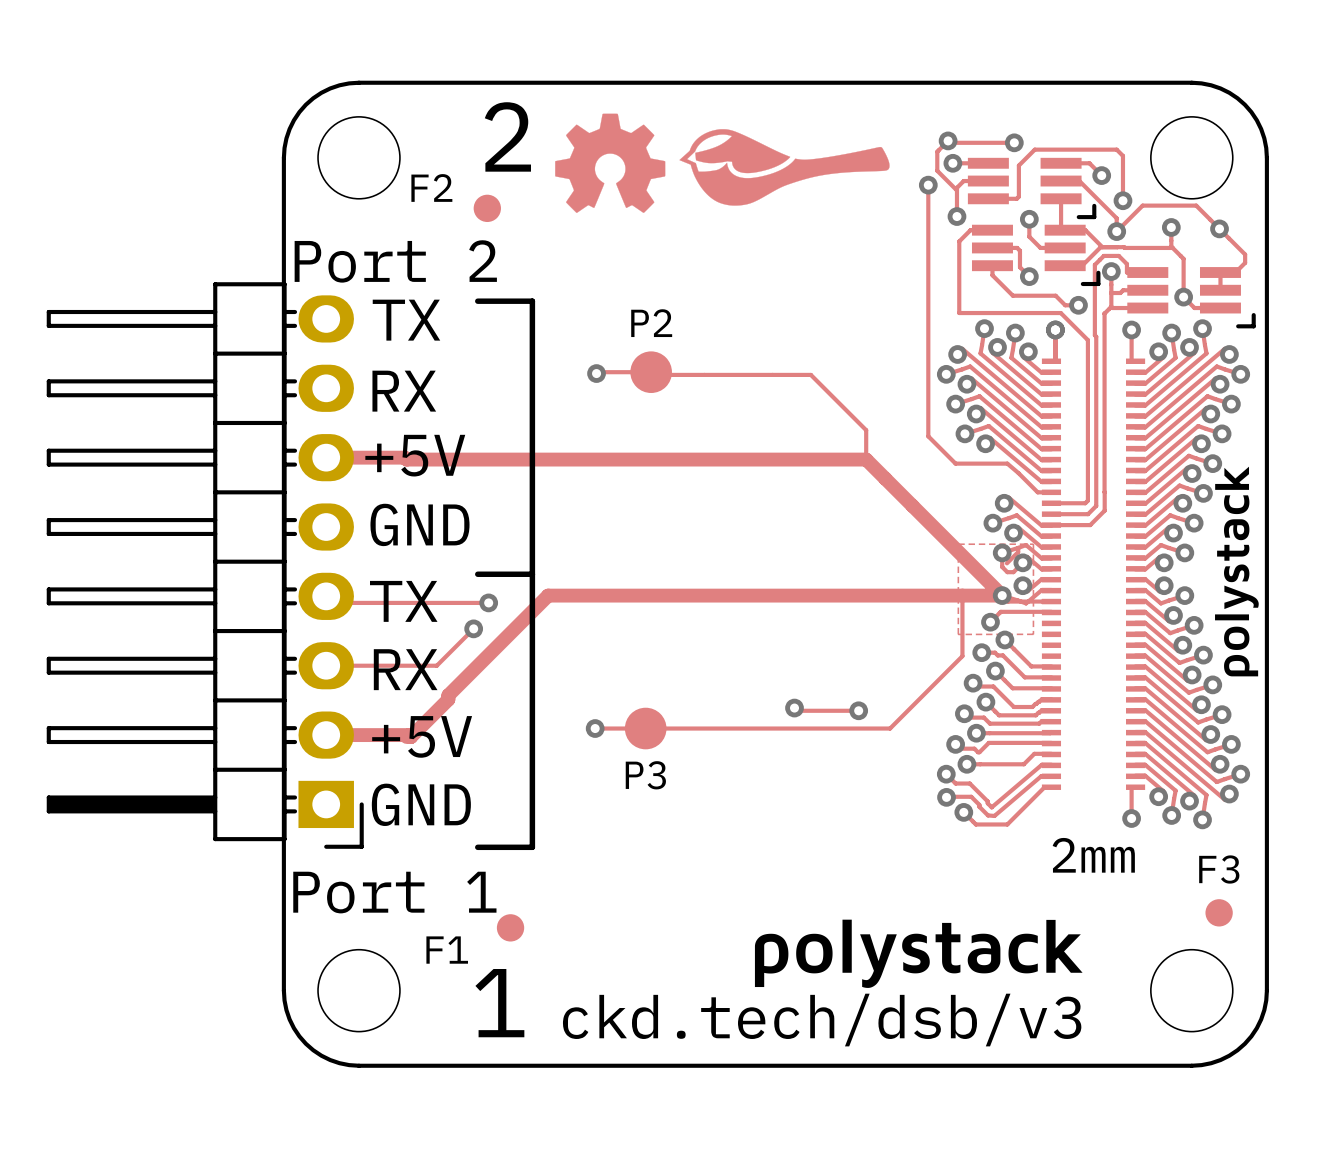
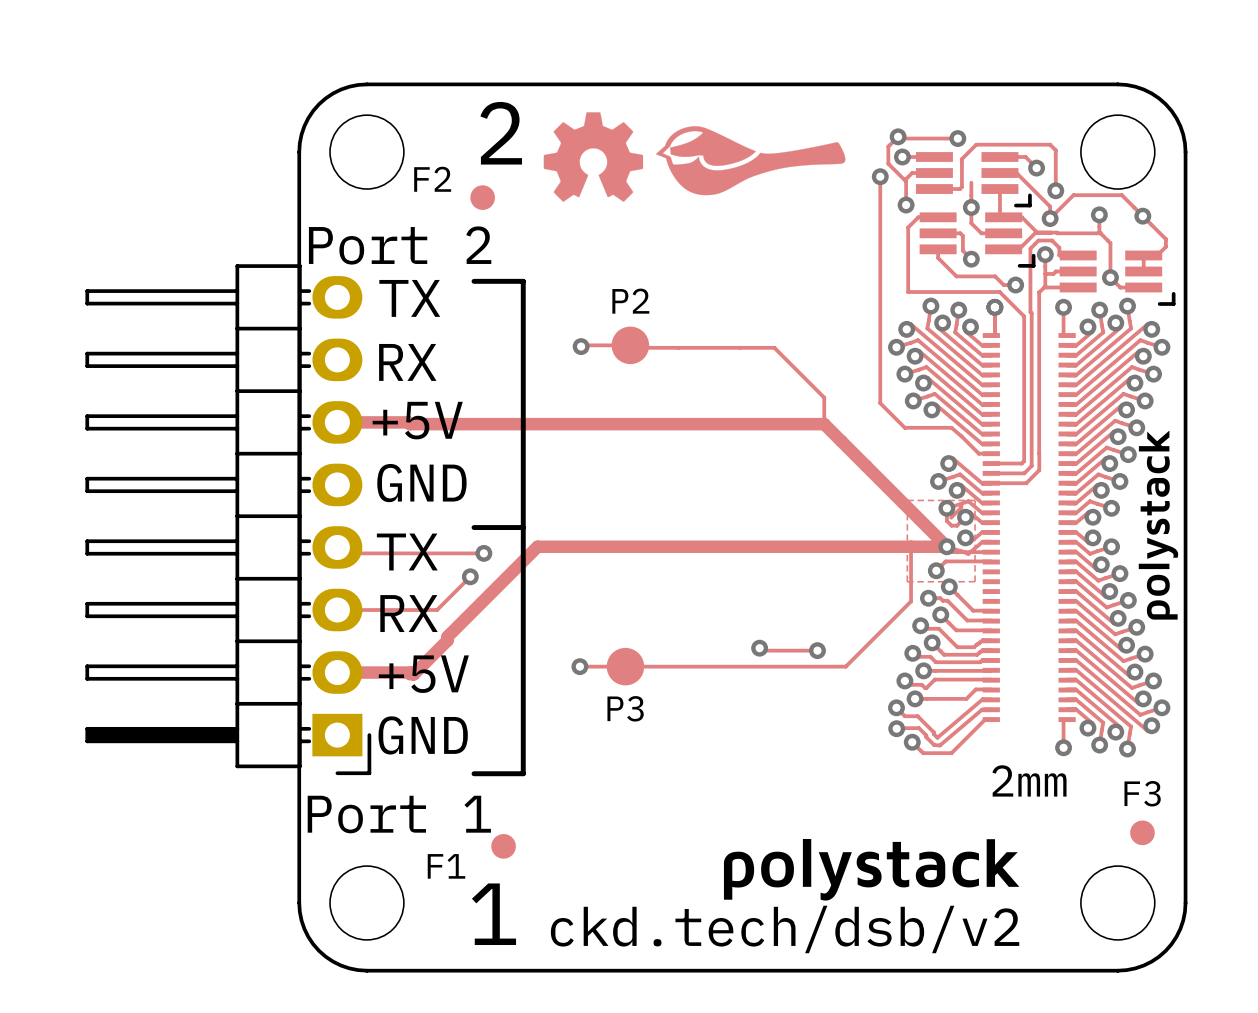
track: none -> (971, 182) (971, 207)
text: ckd.tech/dsb/v3 (822, 1020) -> ckd.tech/dsb/v2 (785, 929)

